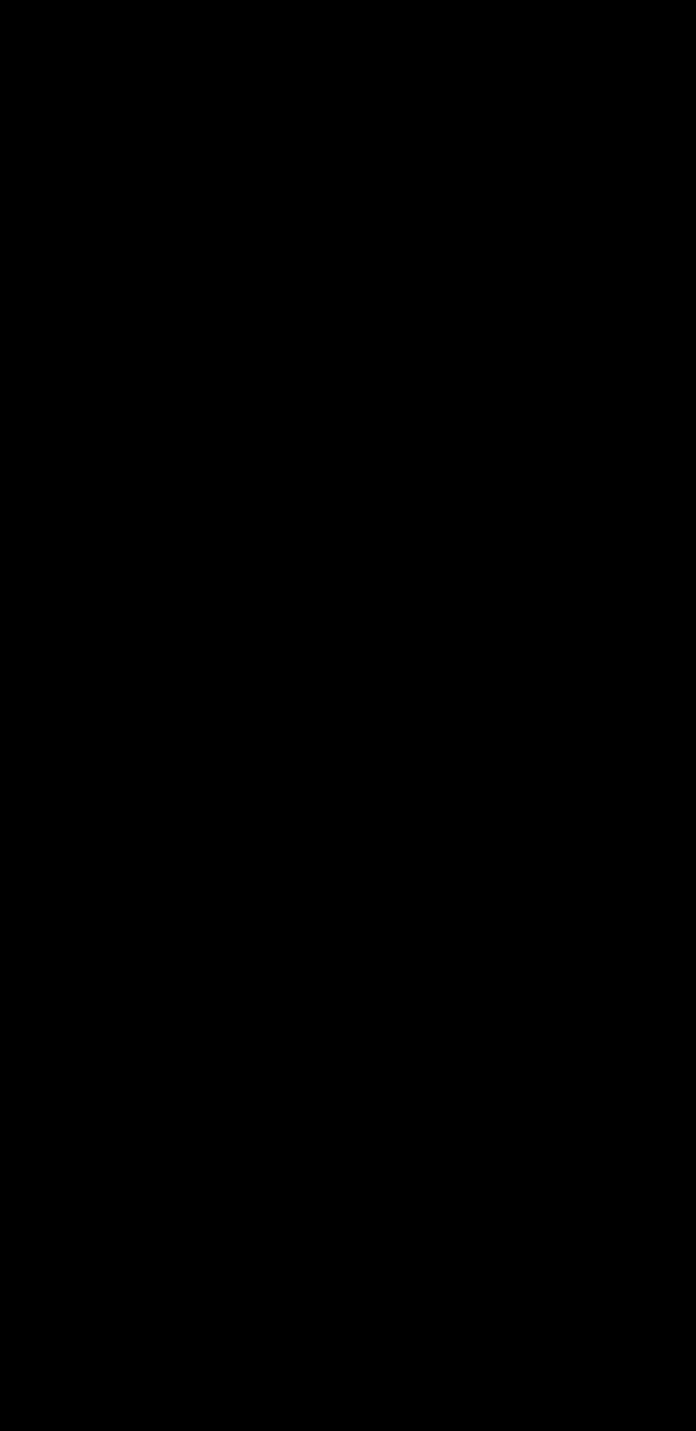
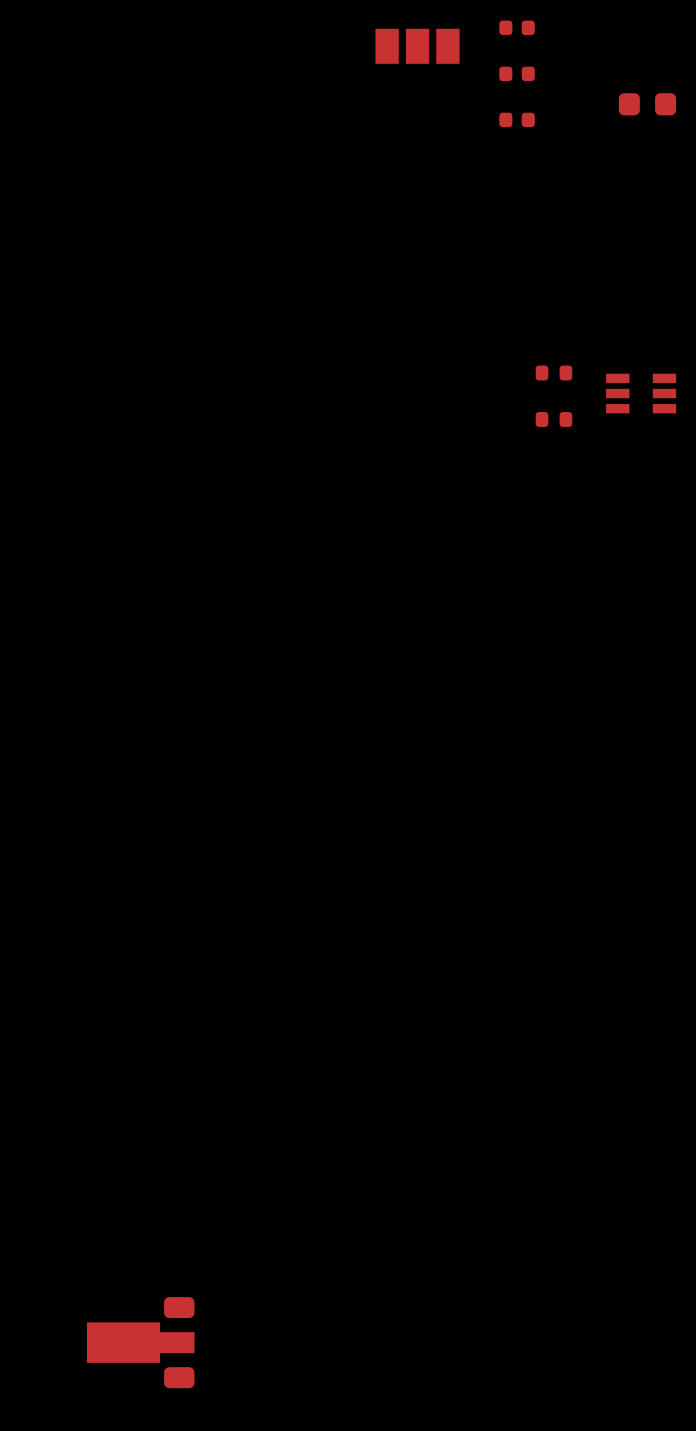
part: none -> (517, 27)
part: none -> (417, 46)
part: none -> (517, 73)
part: none -> (647, 104)
part: none -> (517, 119)
part: none -> (553, 372)
part: none -> (641, 393)
part: none -> (553, 419)
part: none -> (140, 1342)

